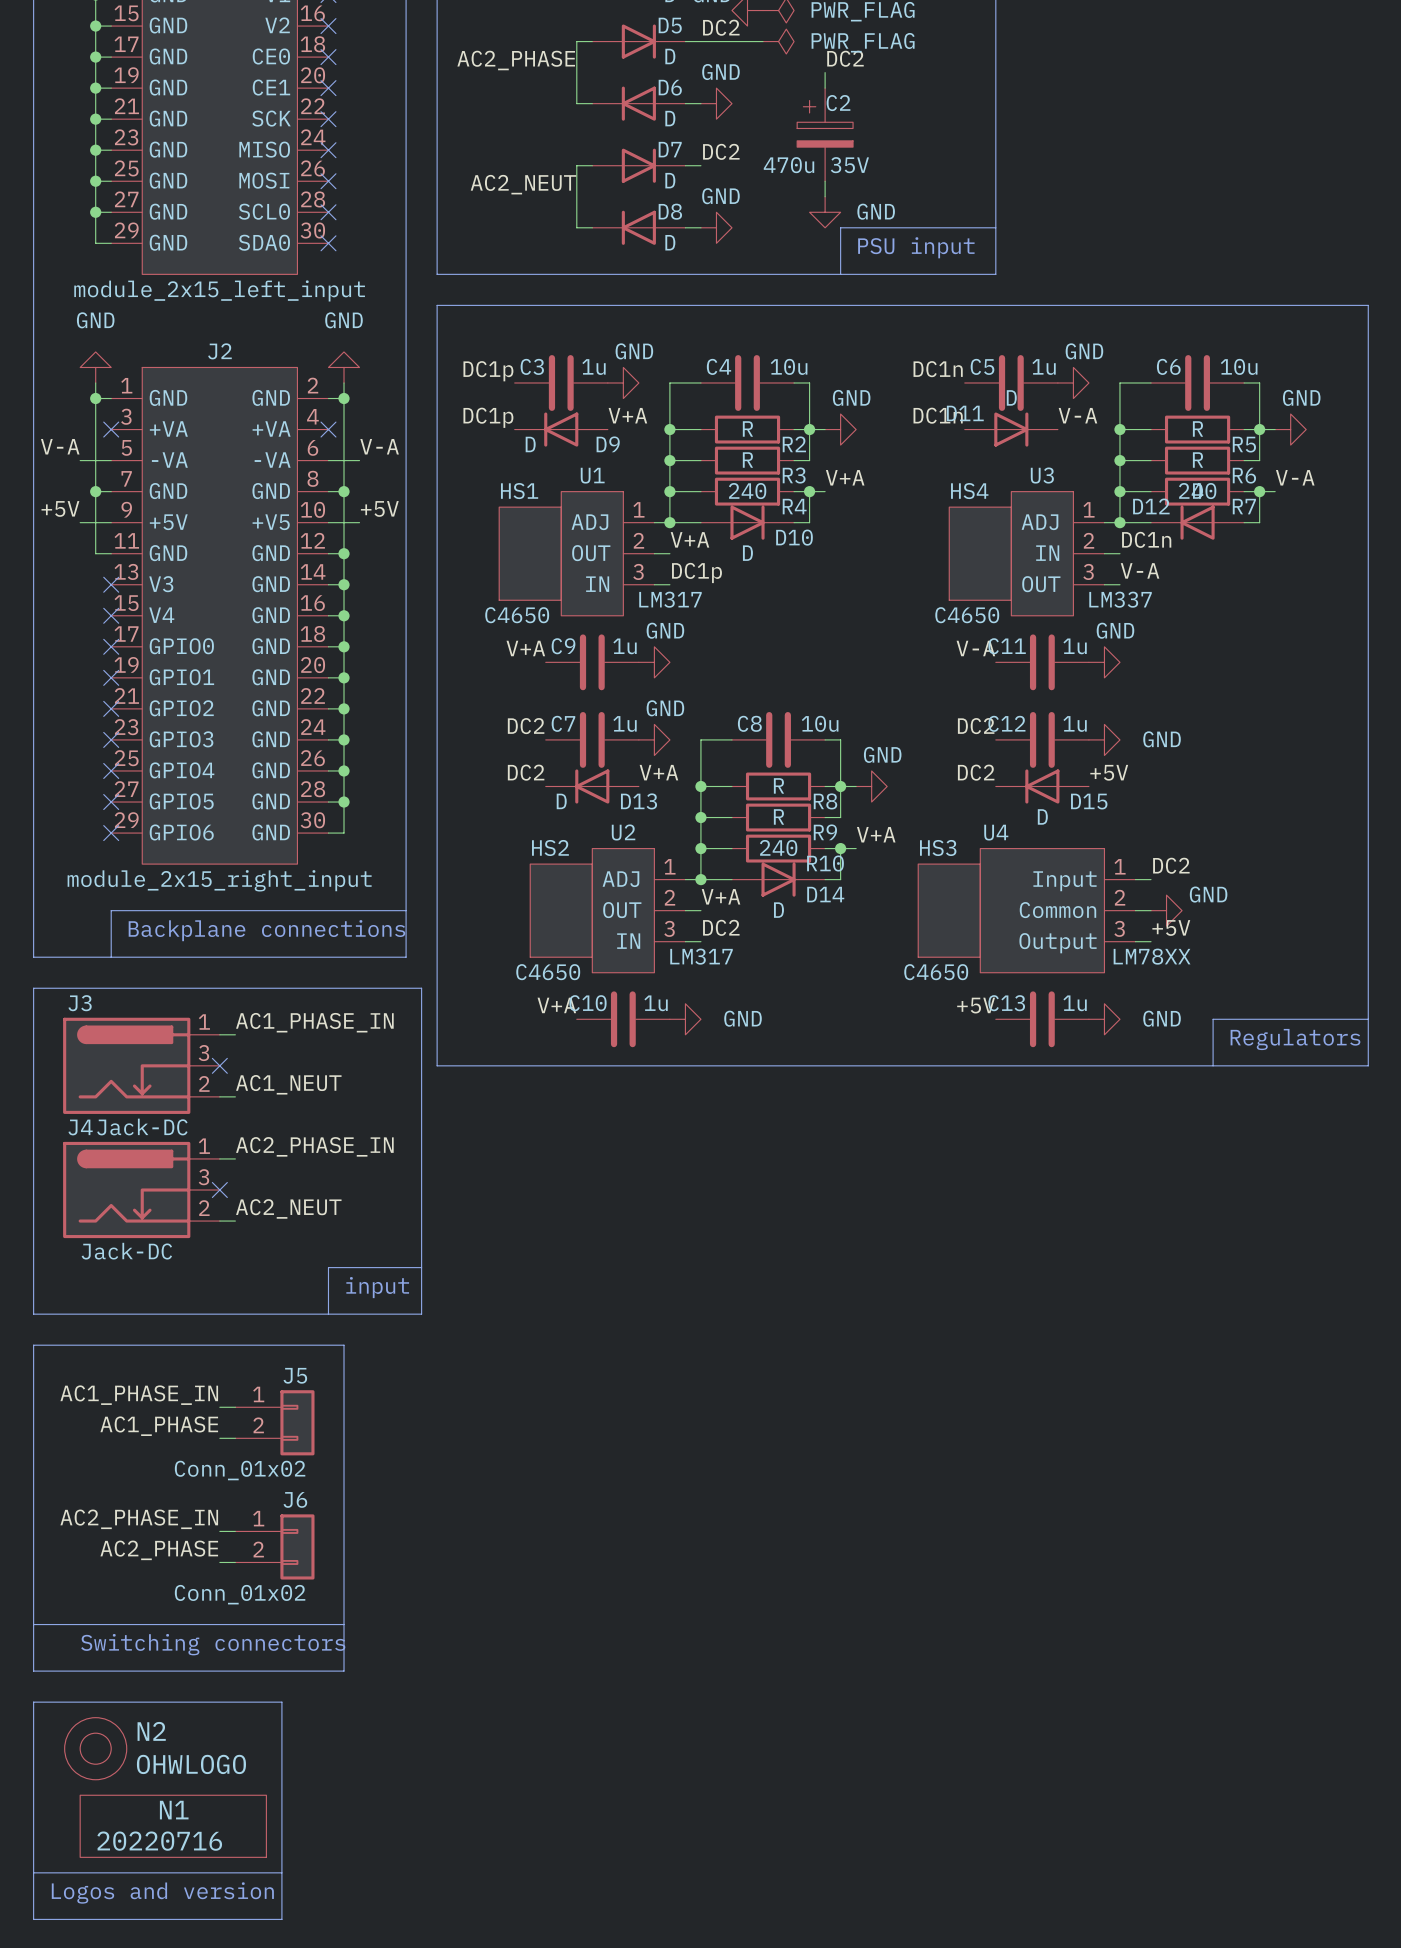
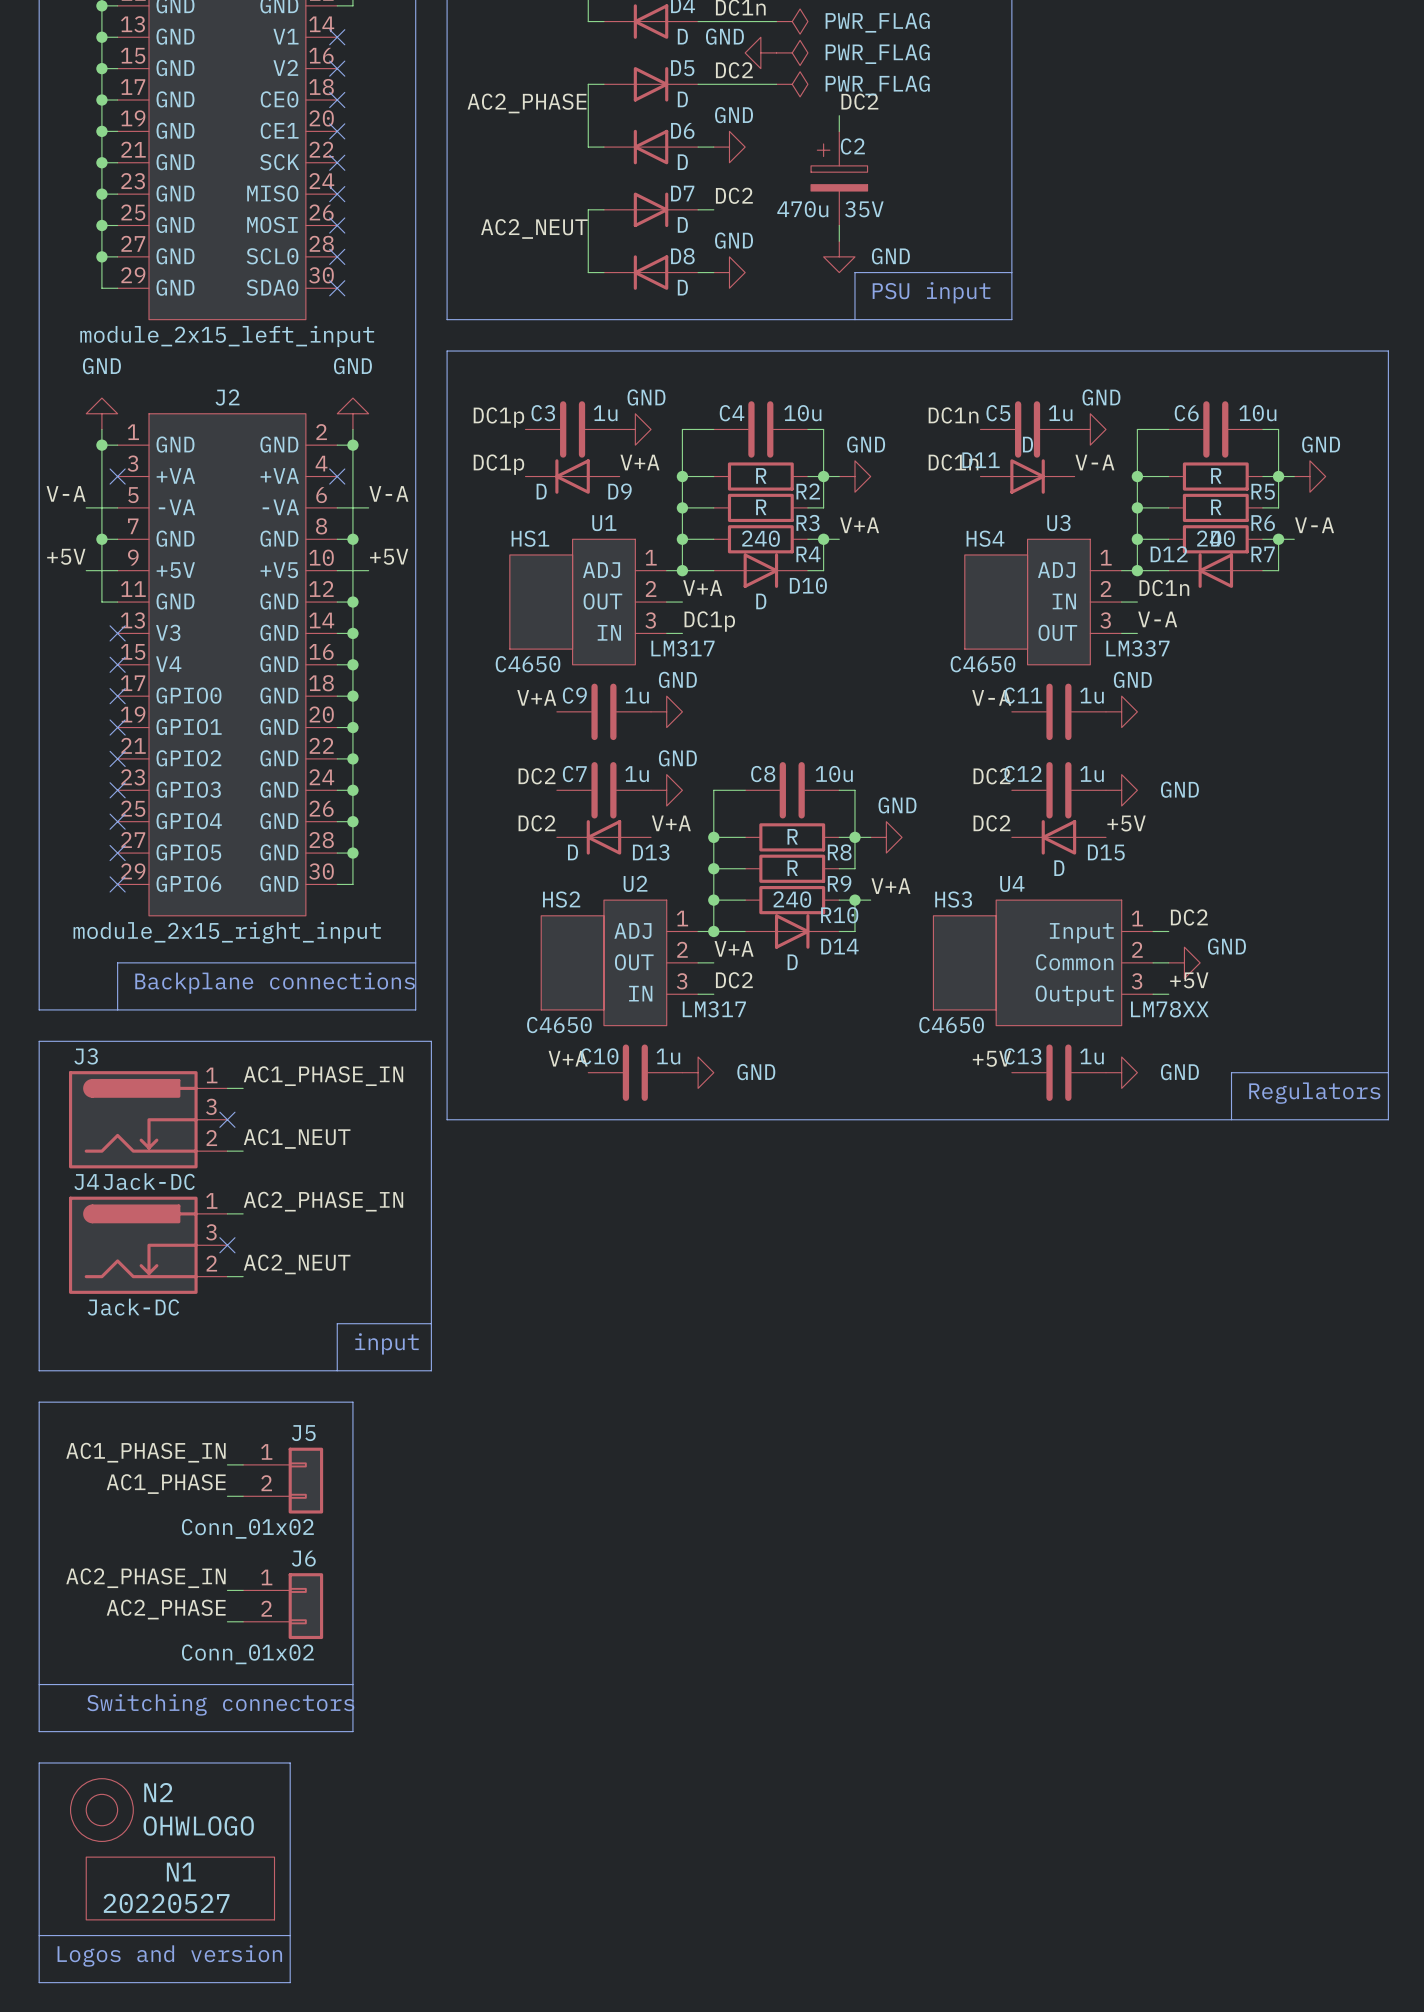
N1 value: 20220716 (159, 1841) -> 20220527 (166, 1903)

